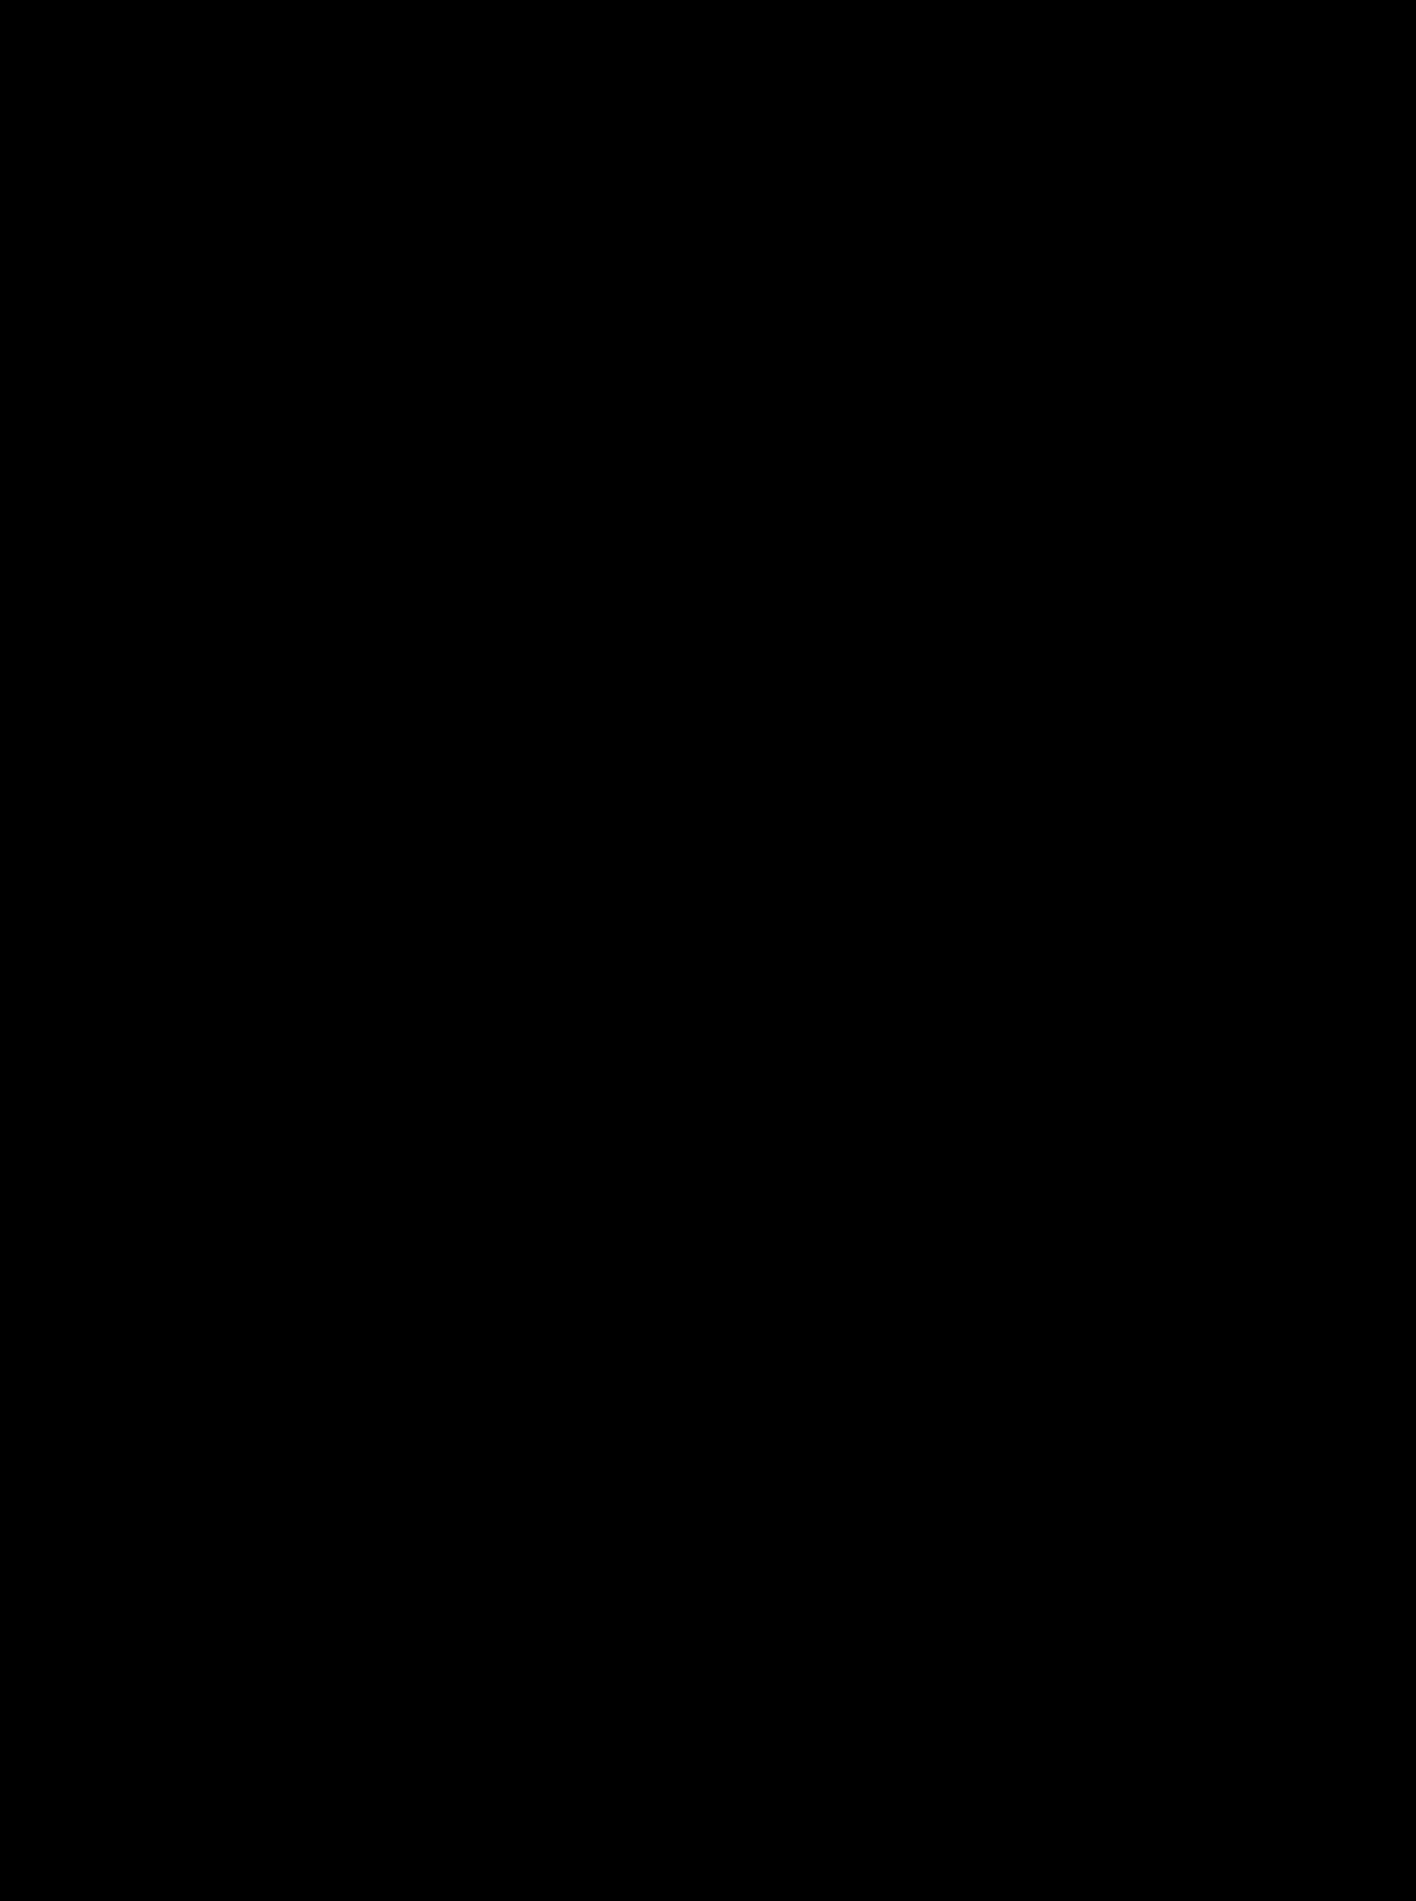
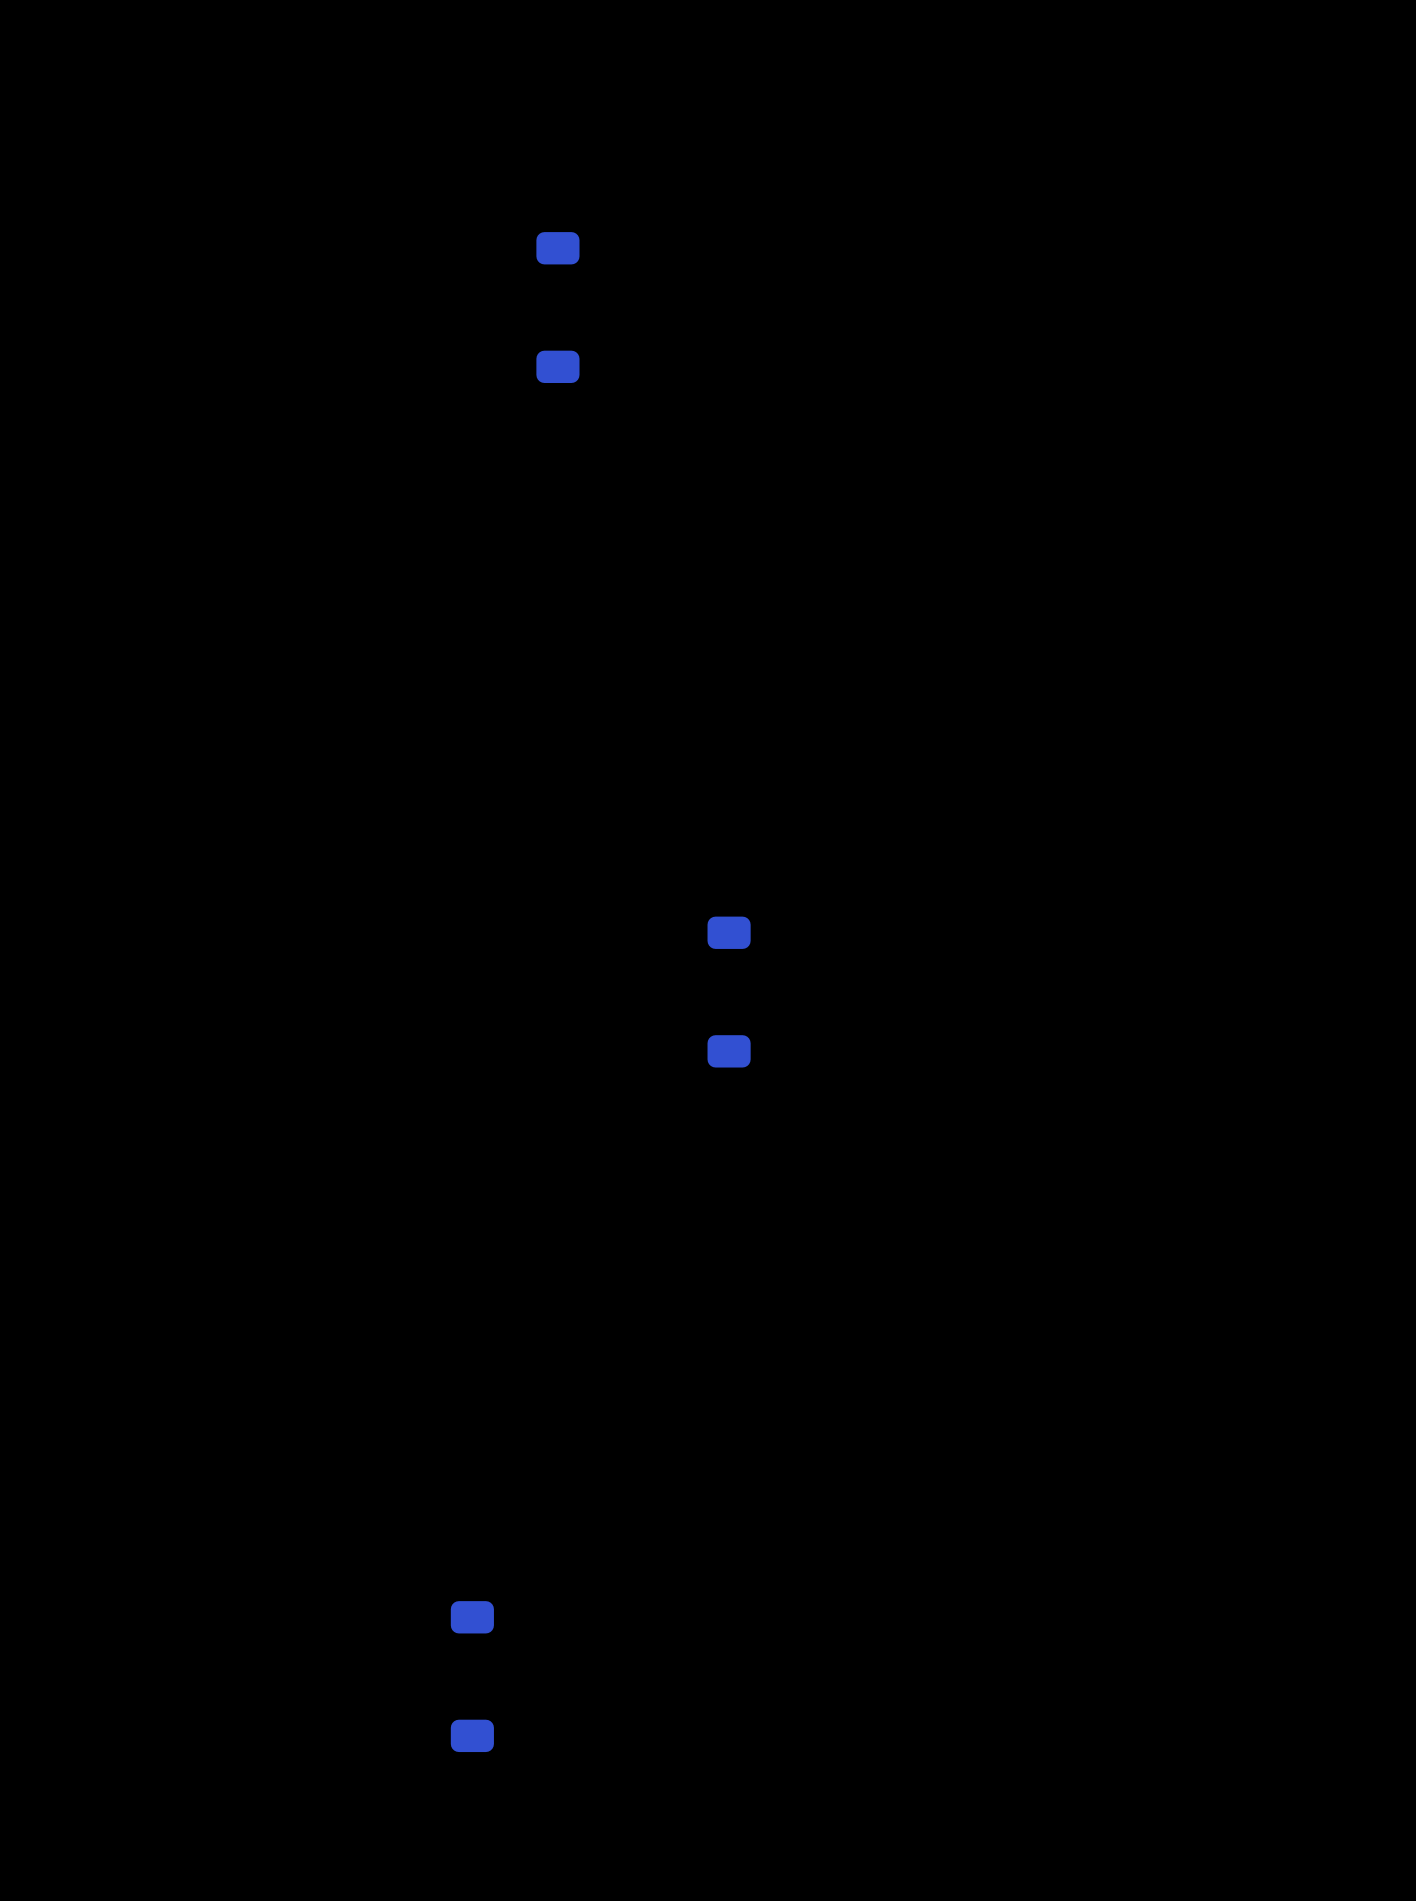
part: none -> (557, 307)
part: none -> (729, 992)
part: none -> (472, 1676)

